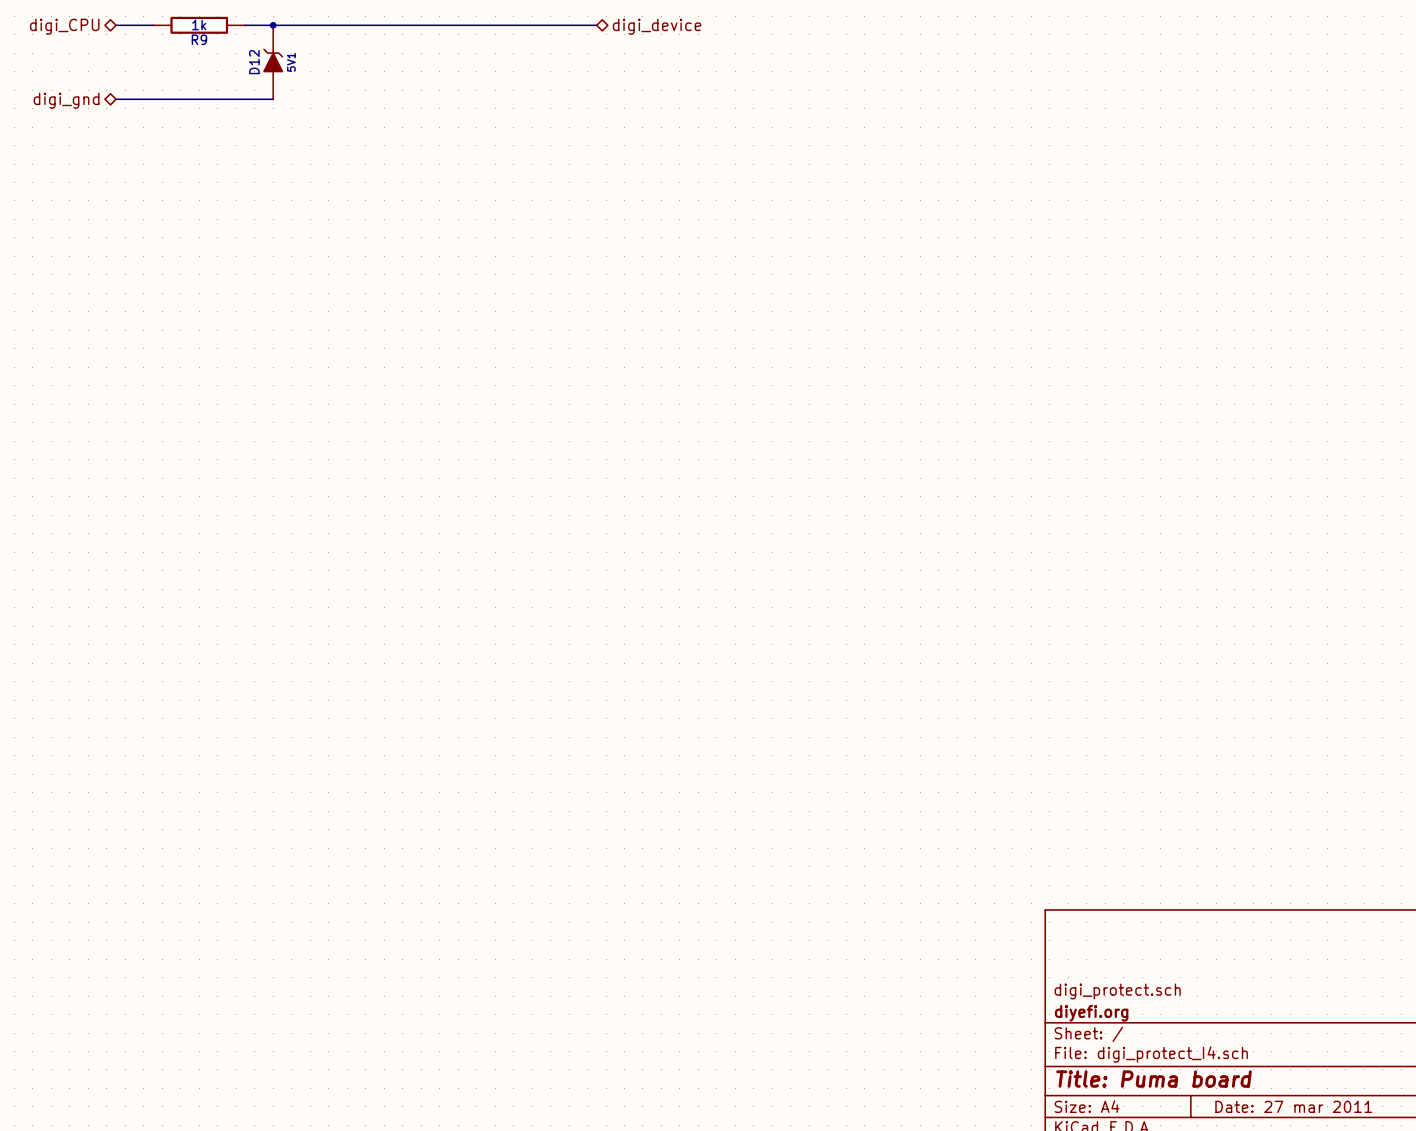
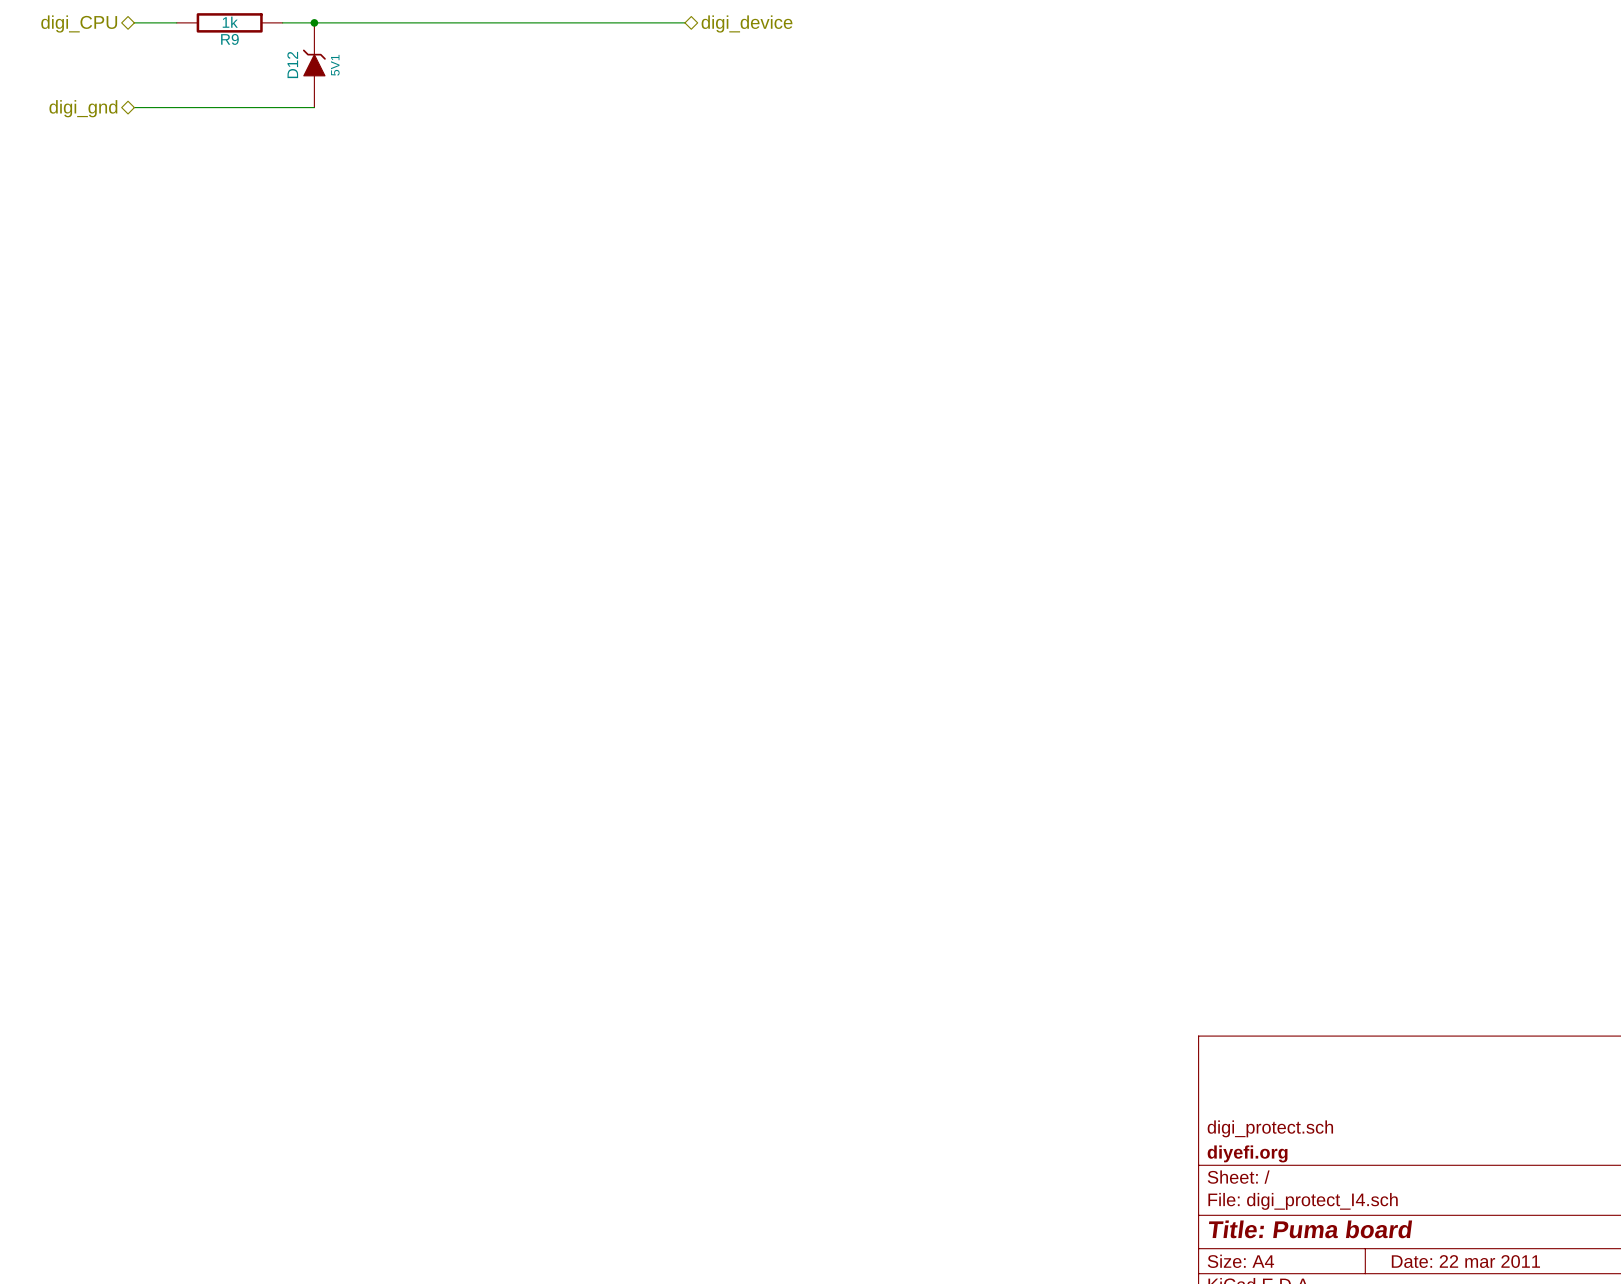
title block: Date: 27 mar 2011 (1293, 1106) -> Date: 22 mar 2011 (1465, 1261)

